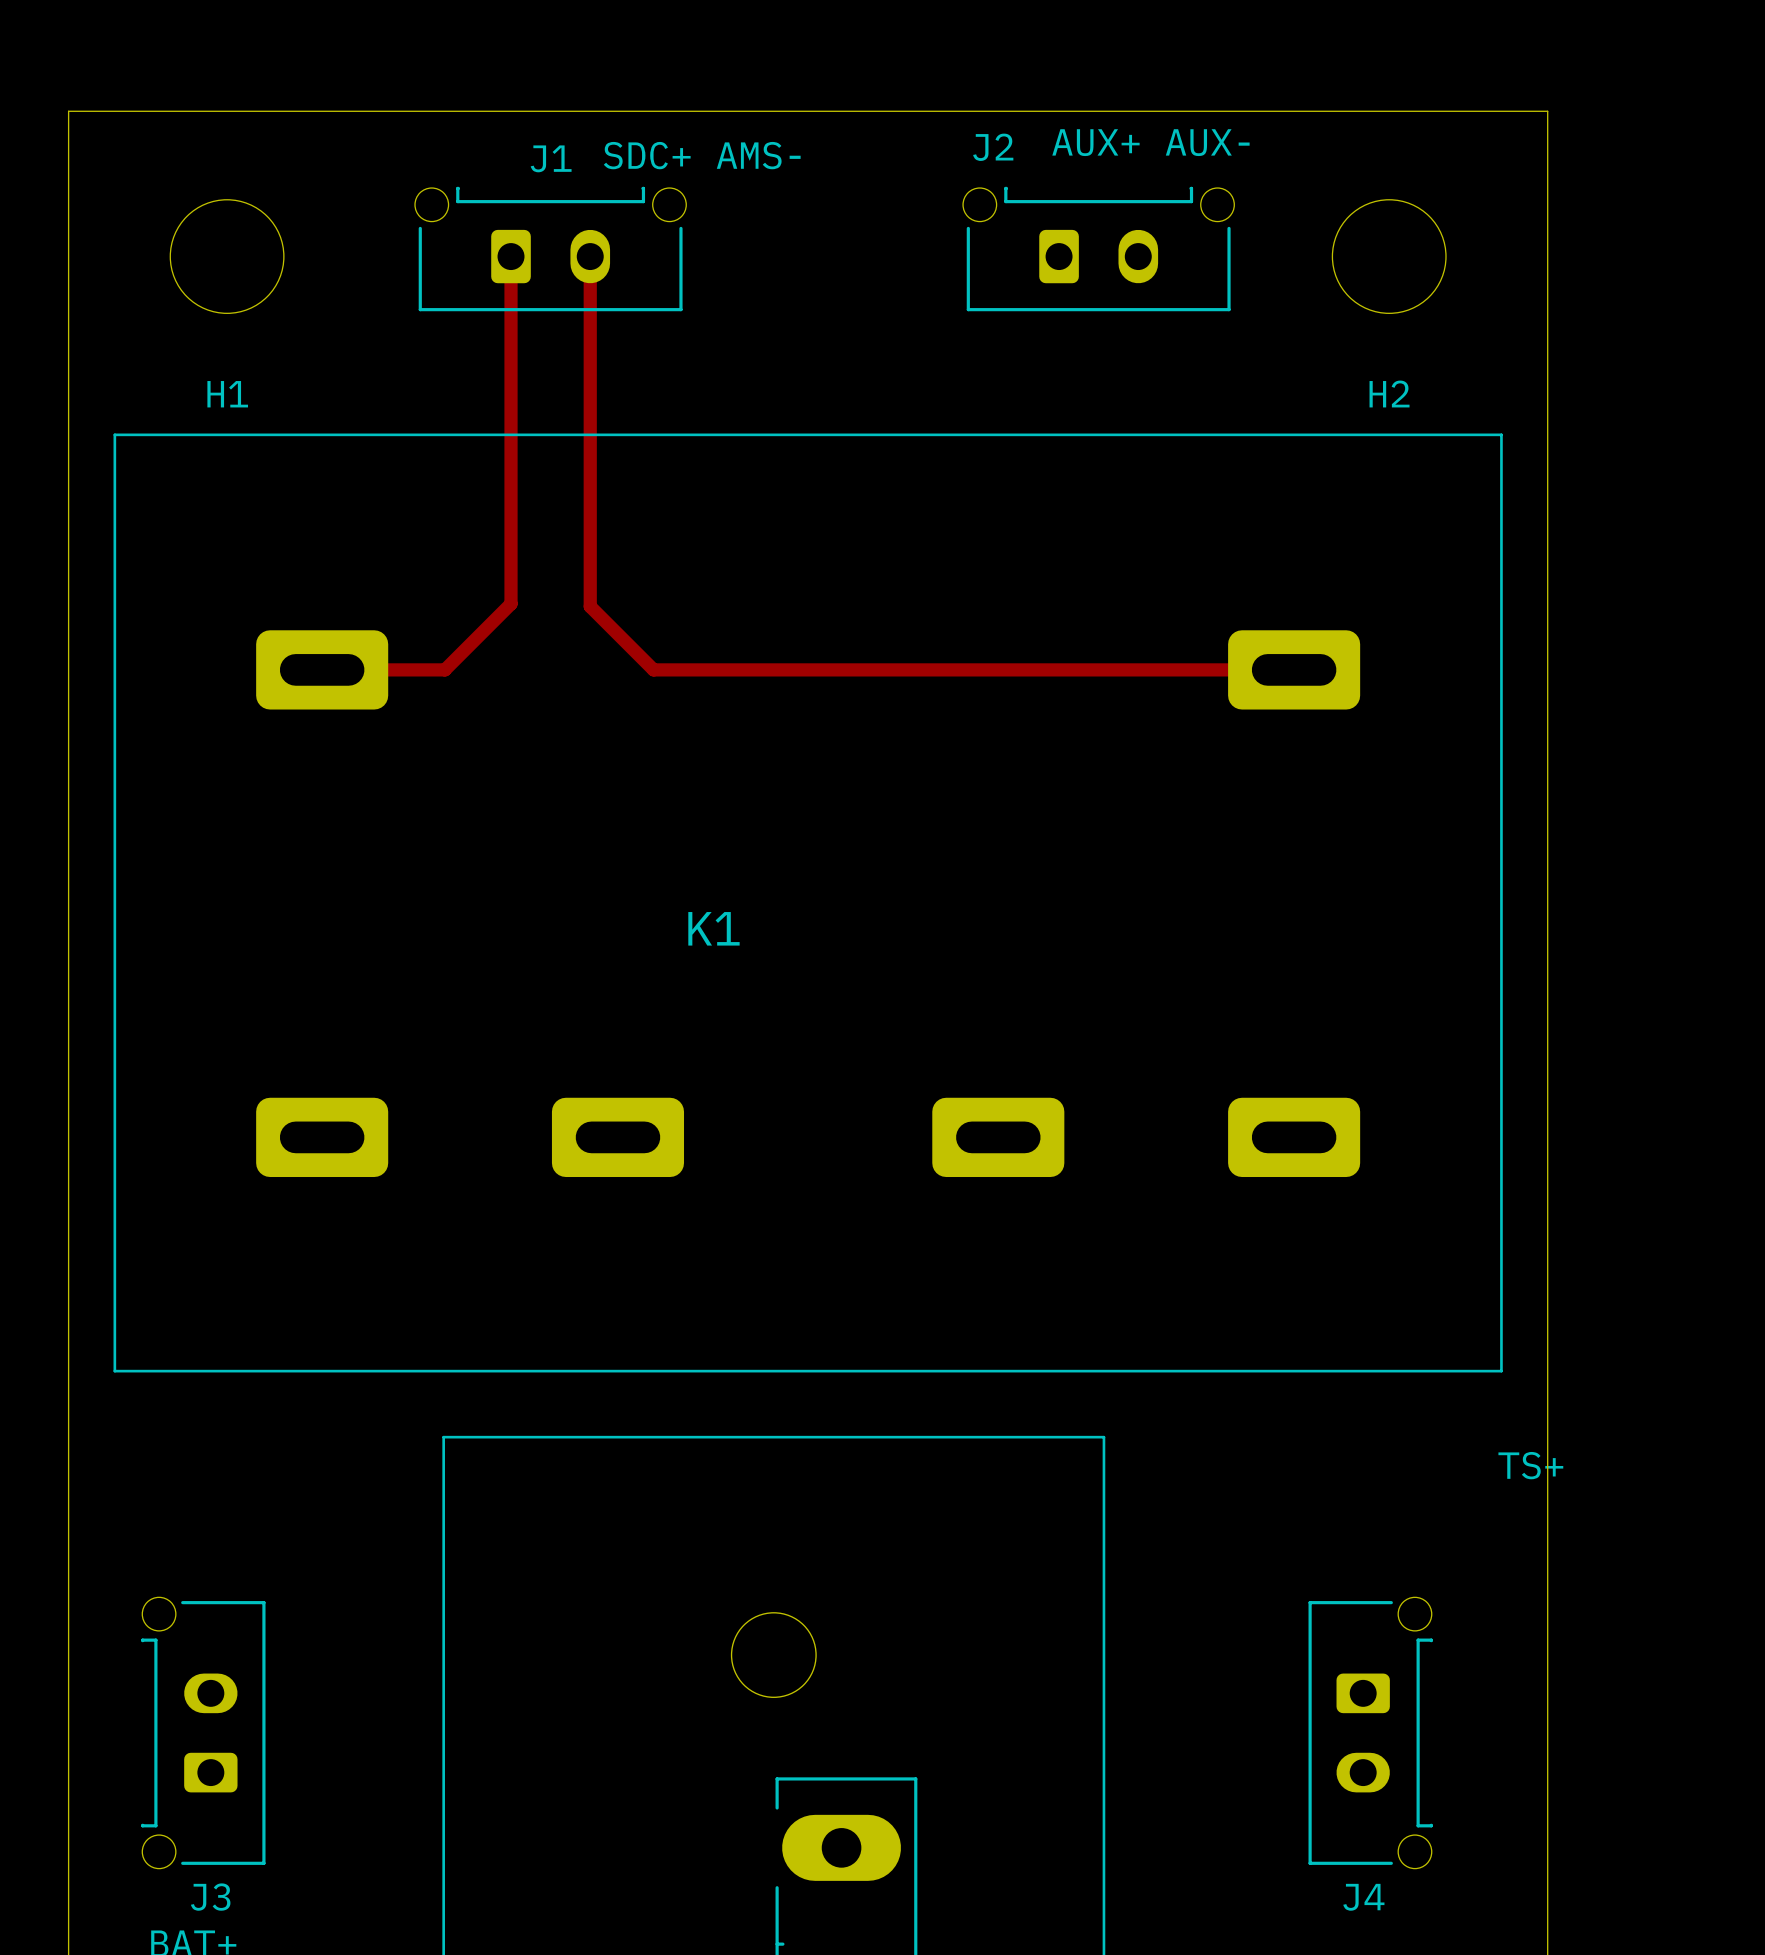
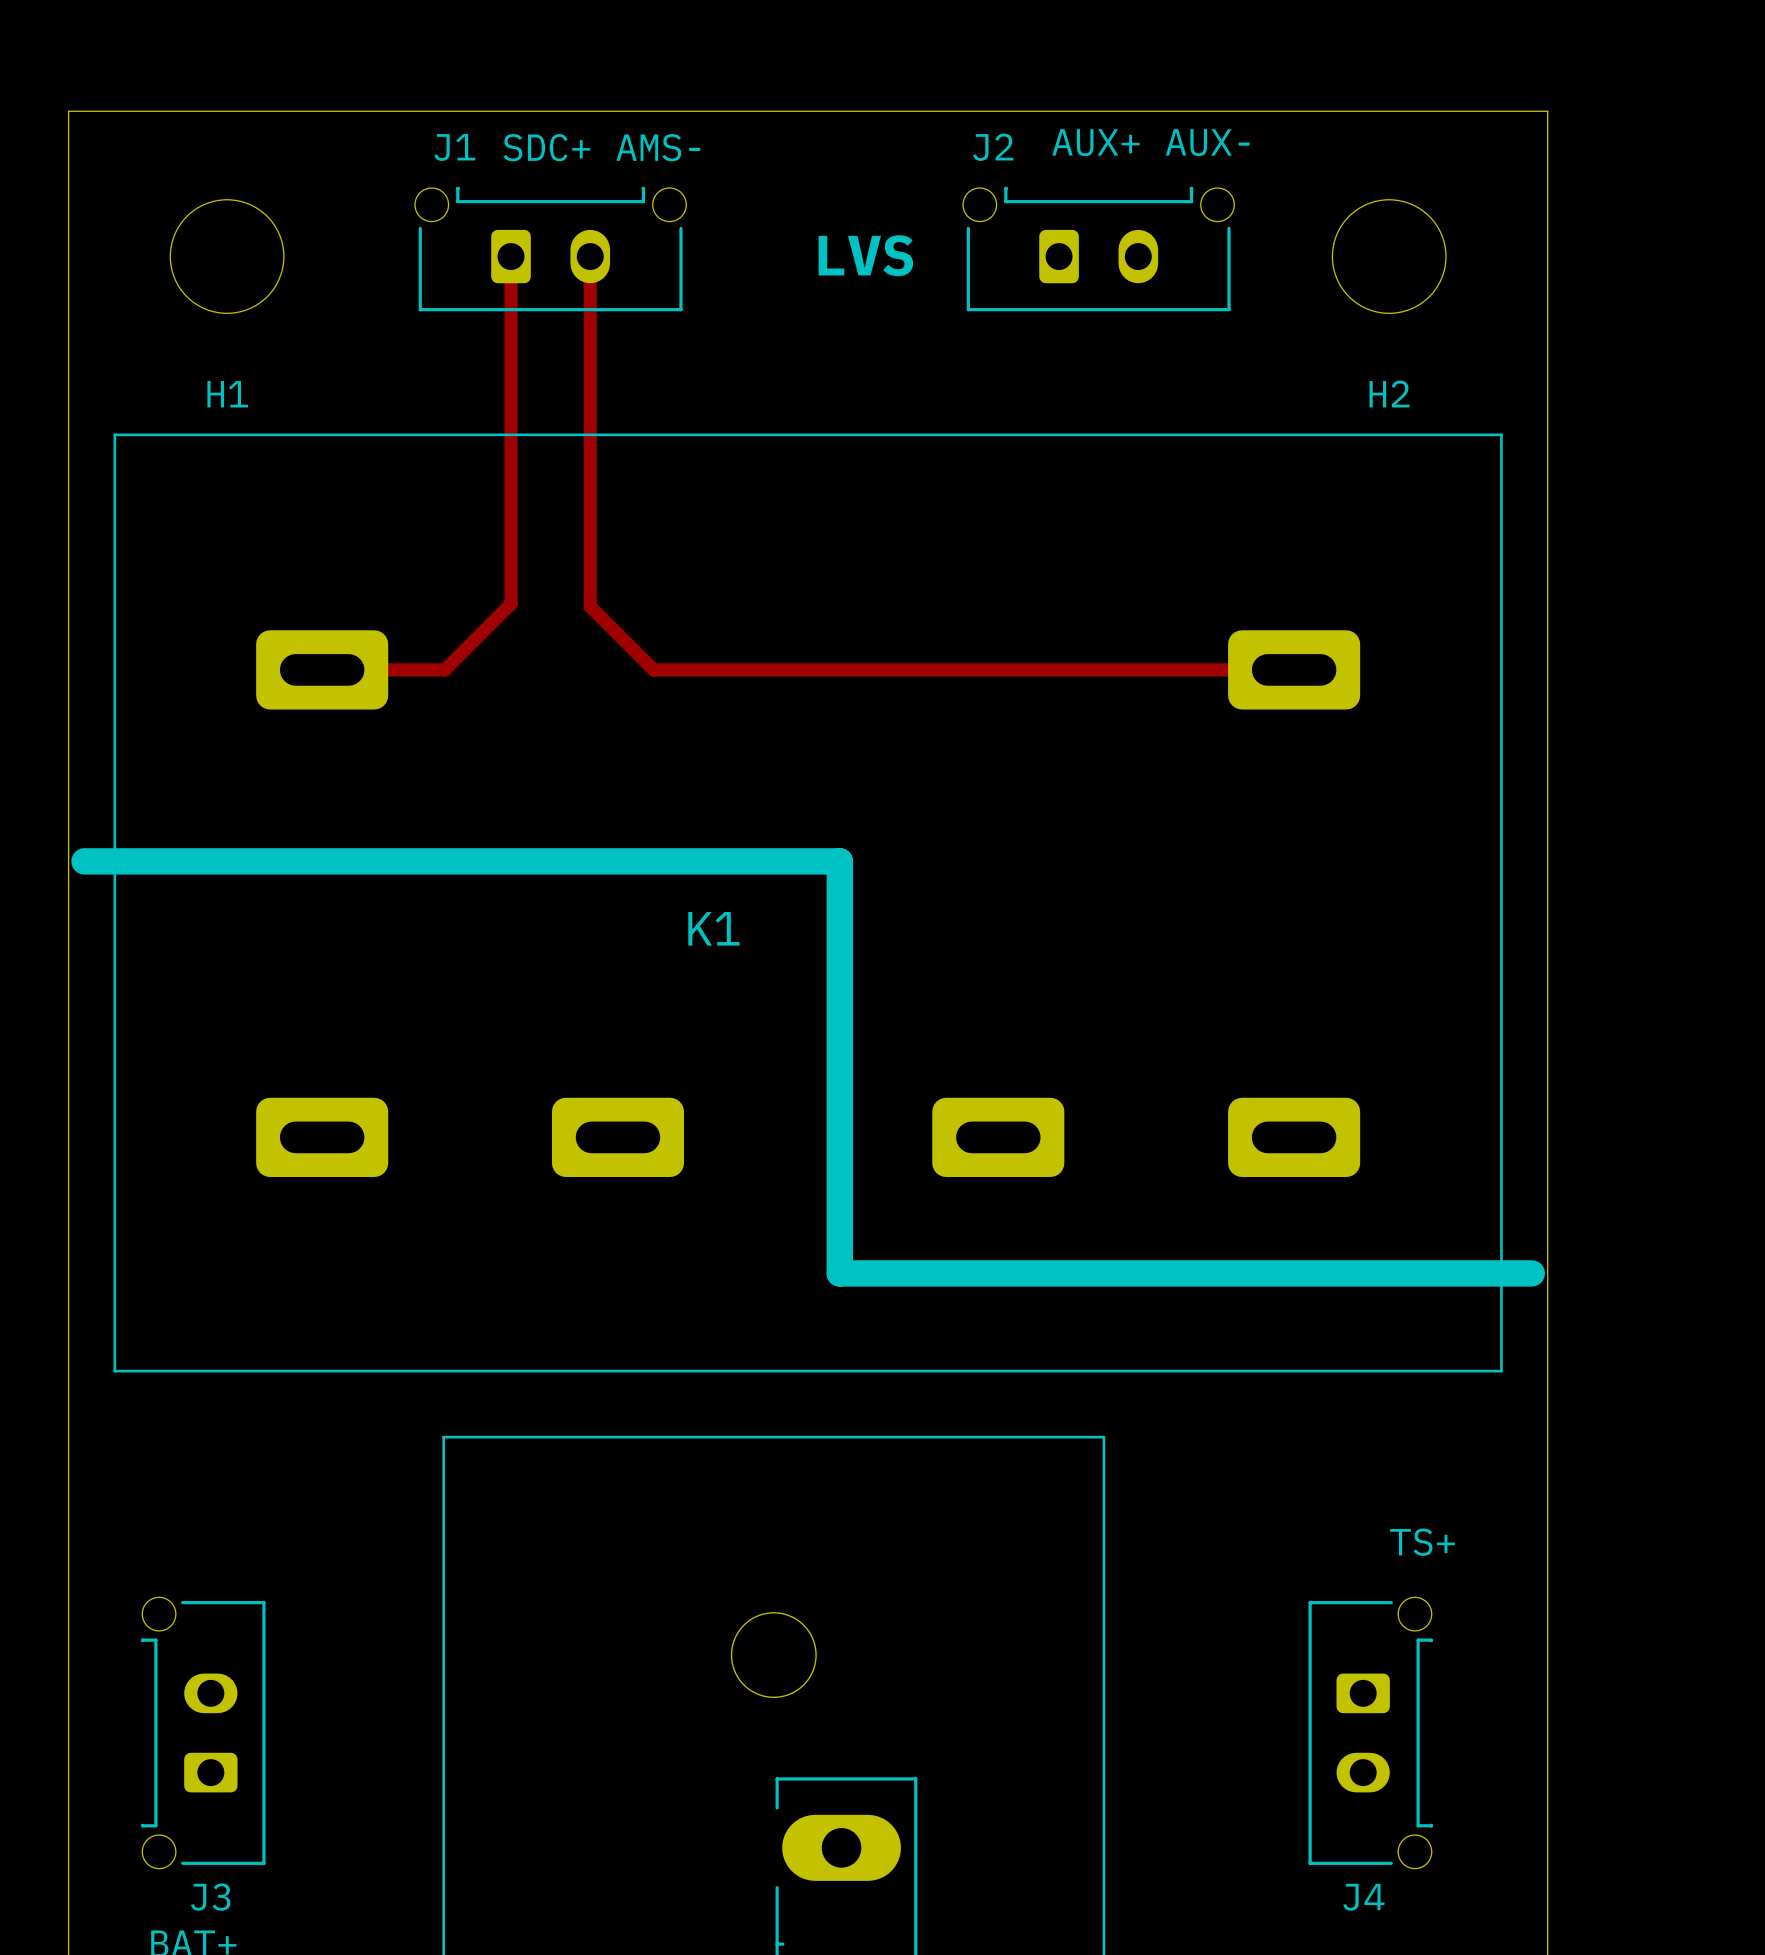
text position: SDC+ AMS- (702, 155) -> SDC+ AMS- (601, 147)
J1 name position: J1 (551, 158) -> J1 (454, 147)
text: none -> LVS (865, 255)
K1 footprint: [113, 433, 1503, 1373] -> [256, 630, 1361, 1178]
line: none -> (114, 434) (114, 1371) (1501, 1371) (1501, 434) (114, 434)
line: none -> (84, 861) (839, 861) (839, 1273) (1531, 1273)
text position: TS+ (1530, 1465) -> TS+ (1422, 1542)

